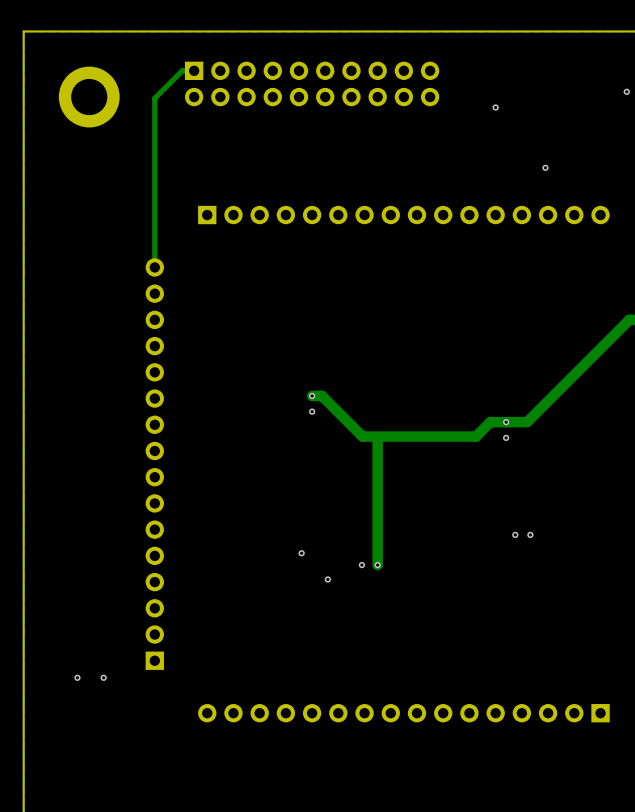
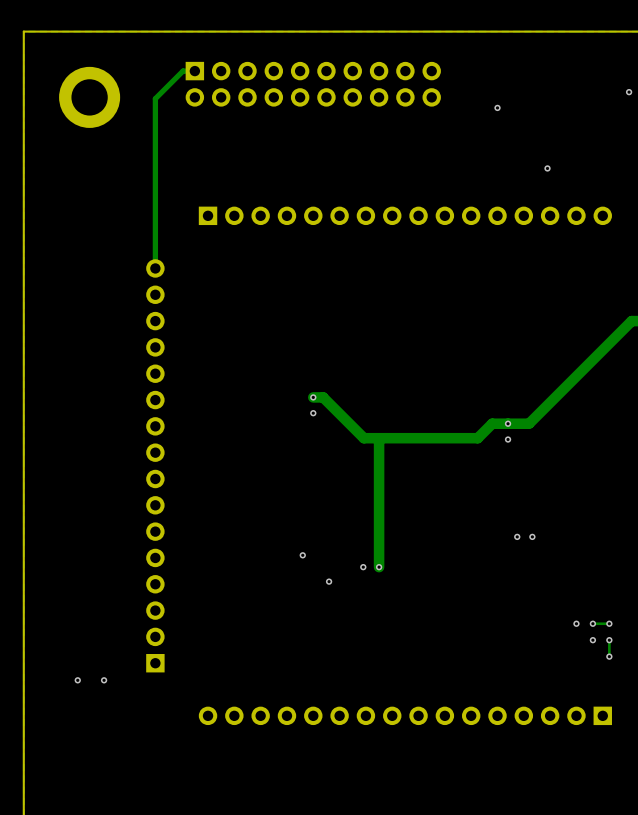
via: none -> (576, 623)
via: none -> (592, 623)
track: none -> (609, 623) (592, 623)
via: none -> (609, 623)
via: none -> (592, 640)
track: none -> (609, 640) (609, 656)
via: none -> (609, 640)
via: none -> (609, 656)

